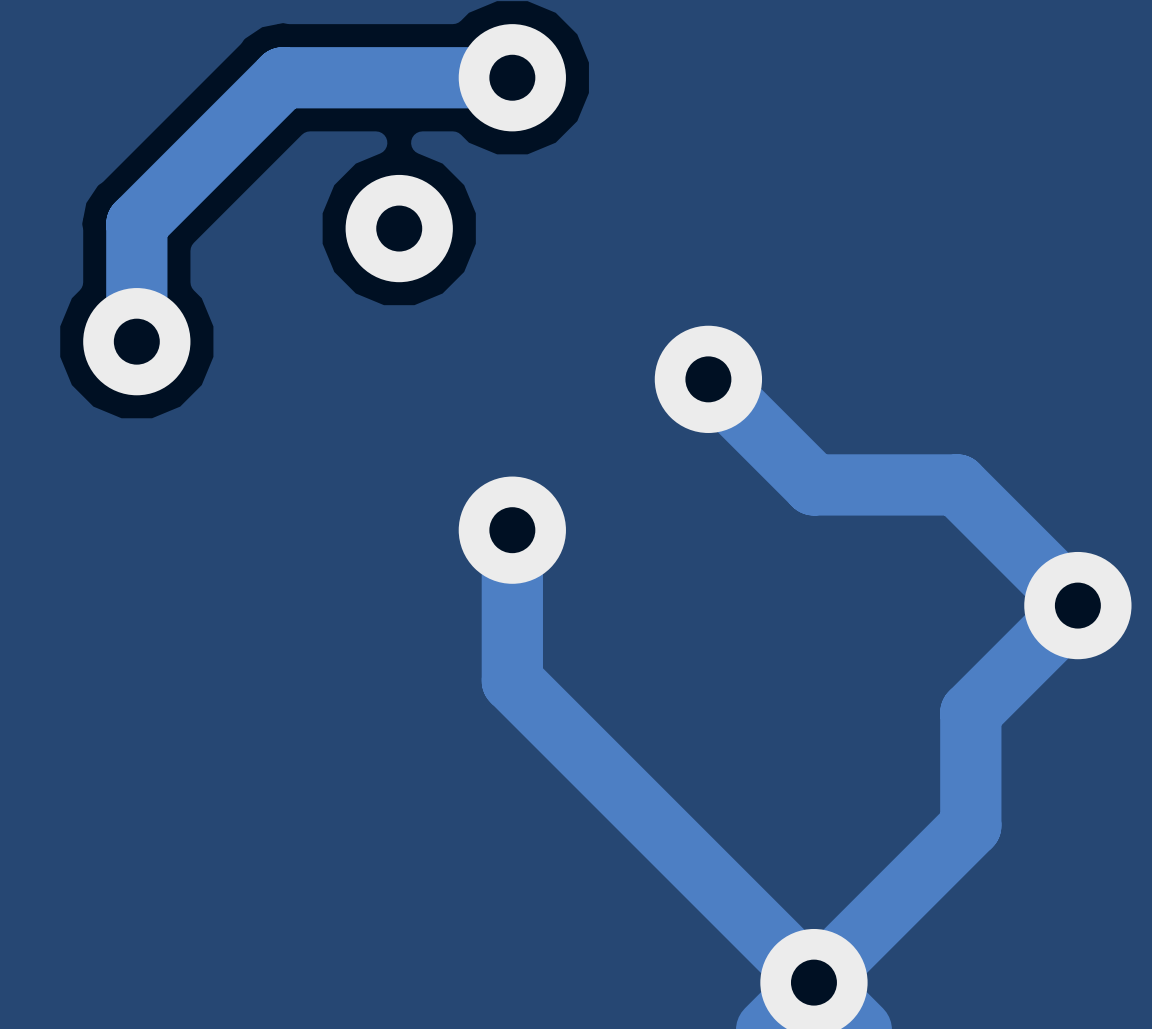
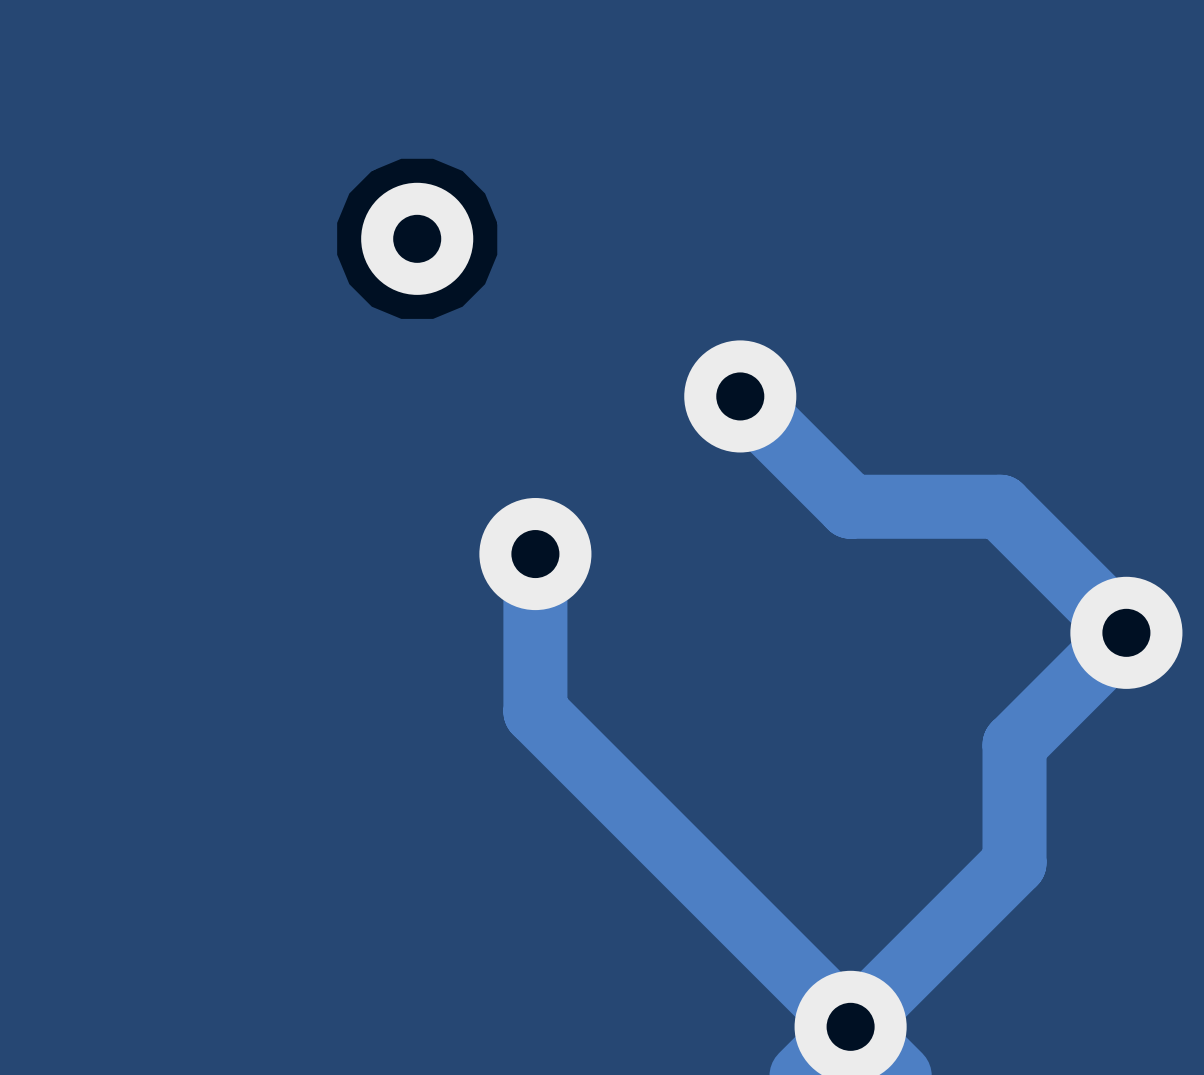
track: (512, 77) (283, 77) (136, 224) (136, 341) -> none
via: (512, 77) -> none
via: (136, 341) -> none

